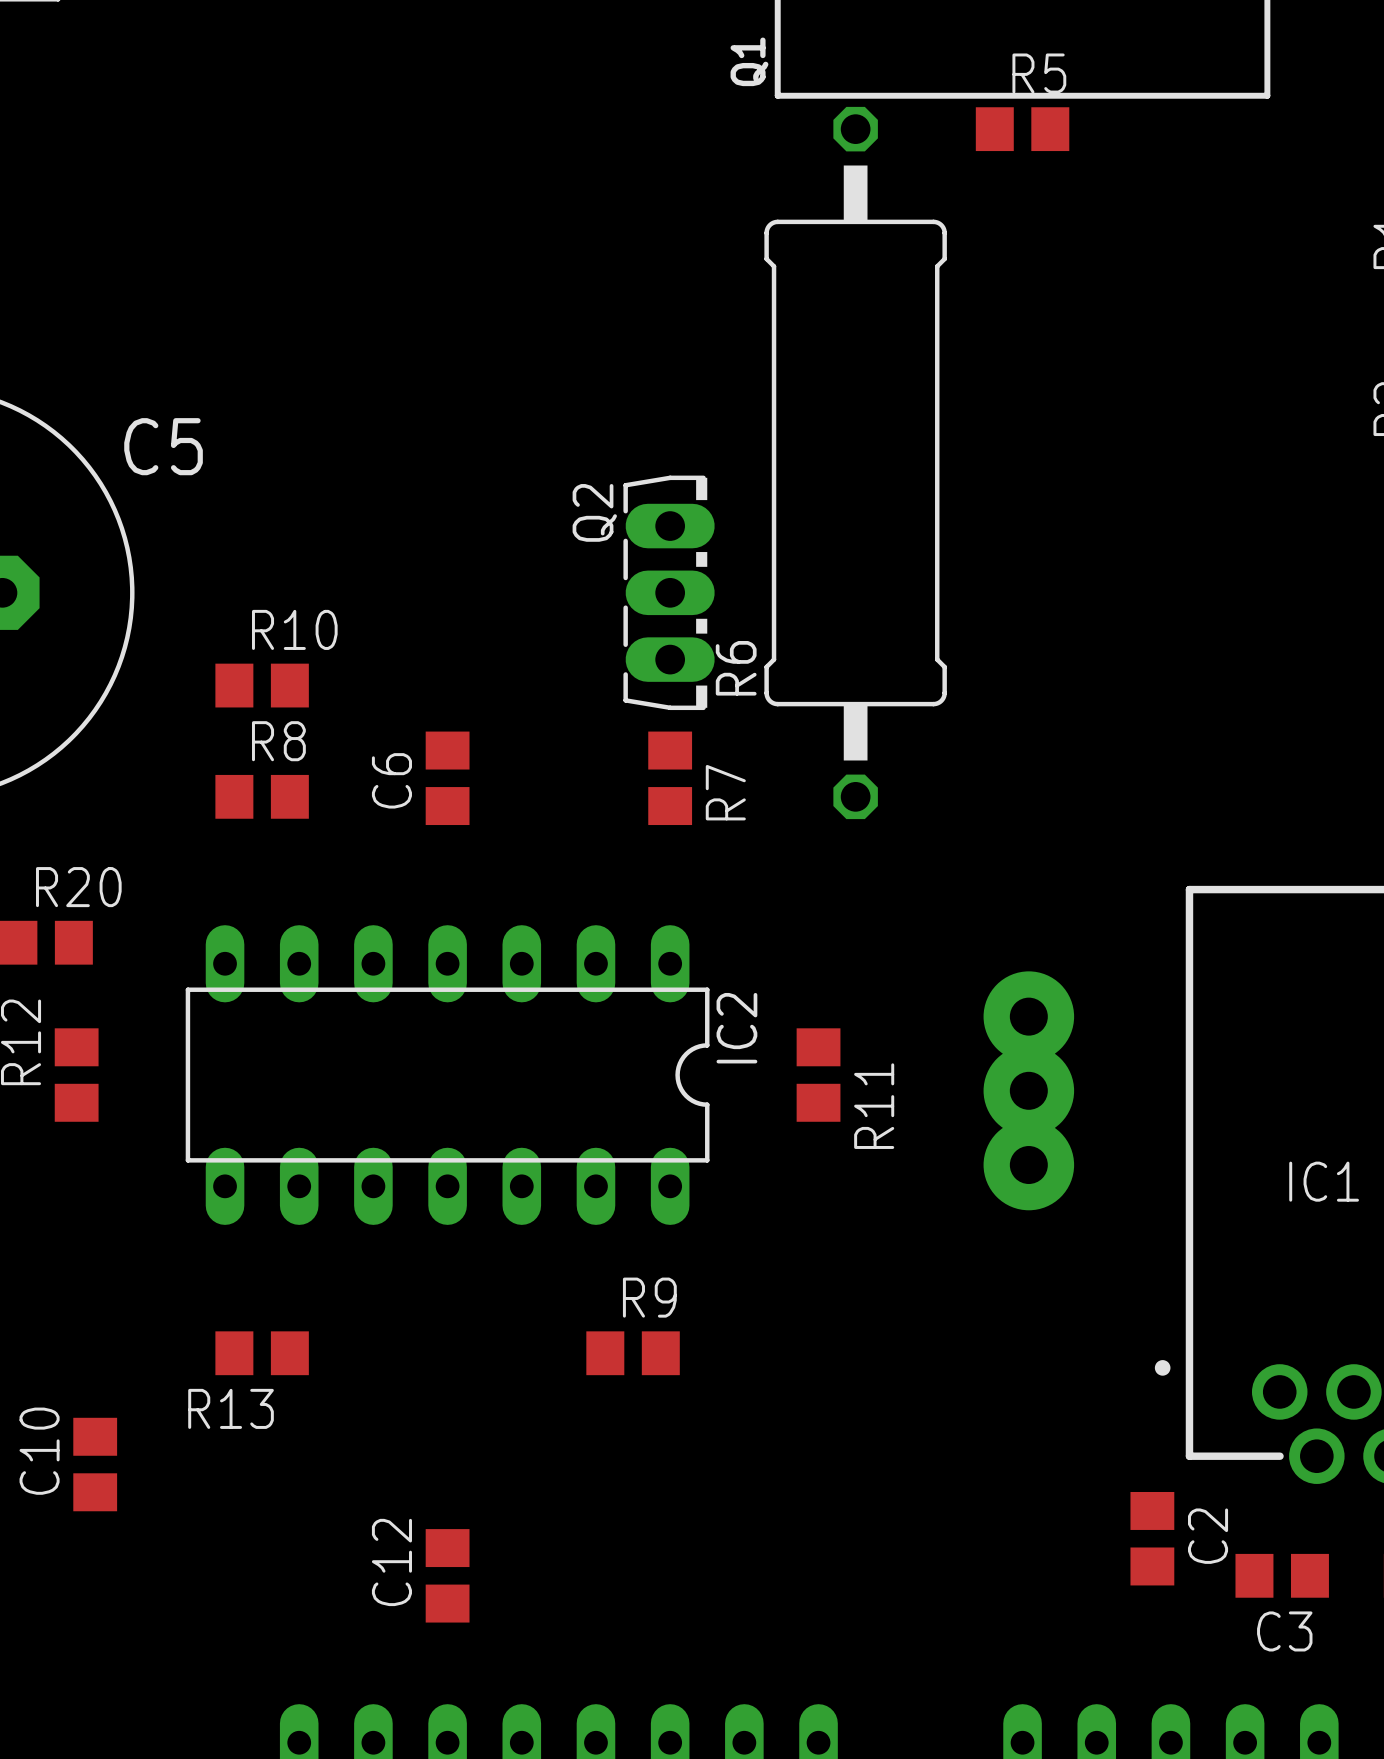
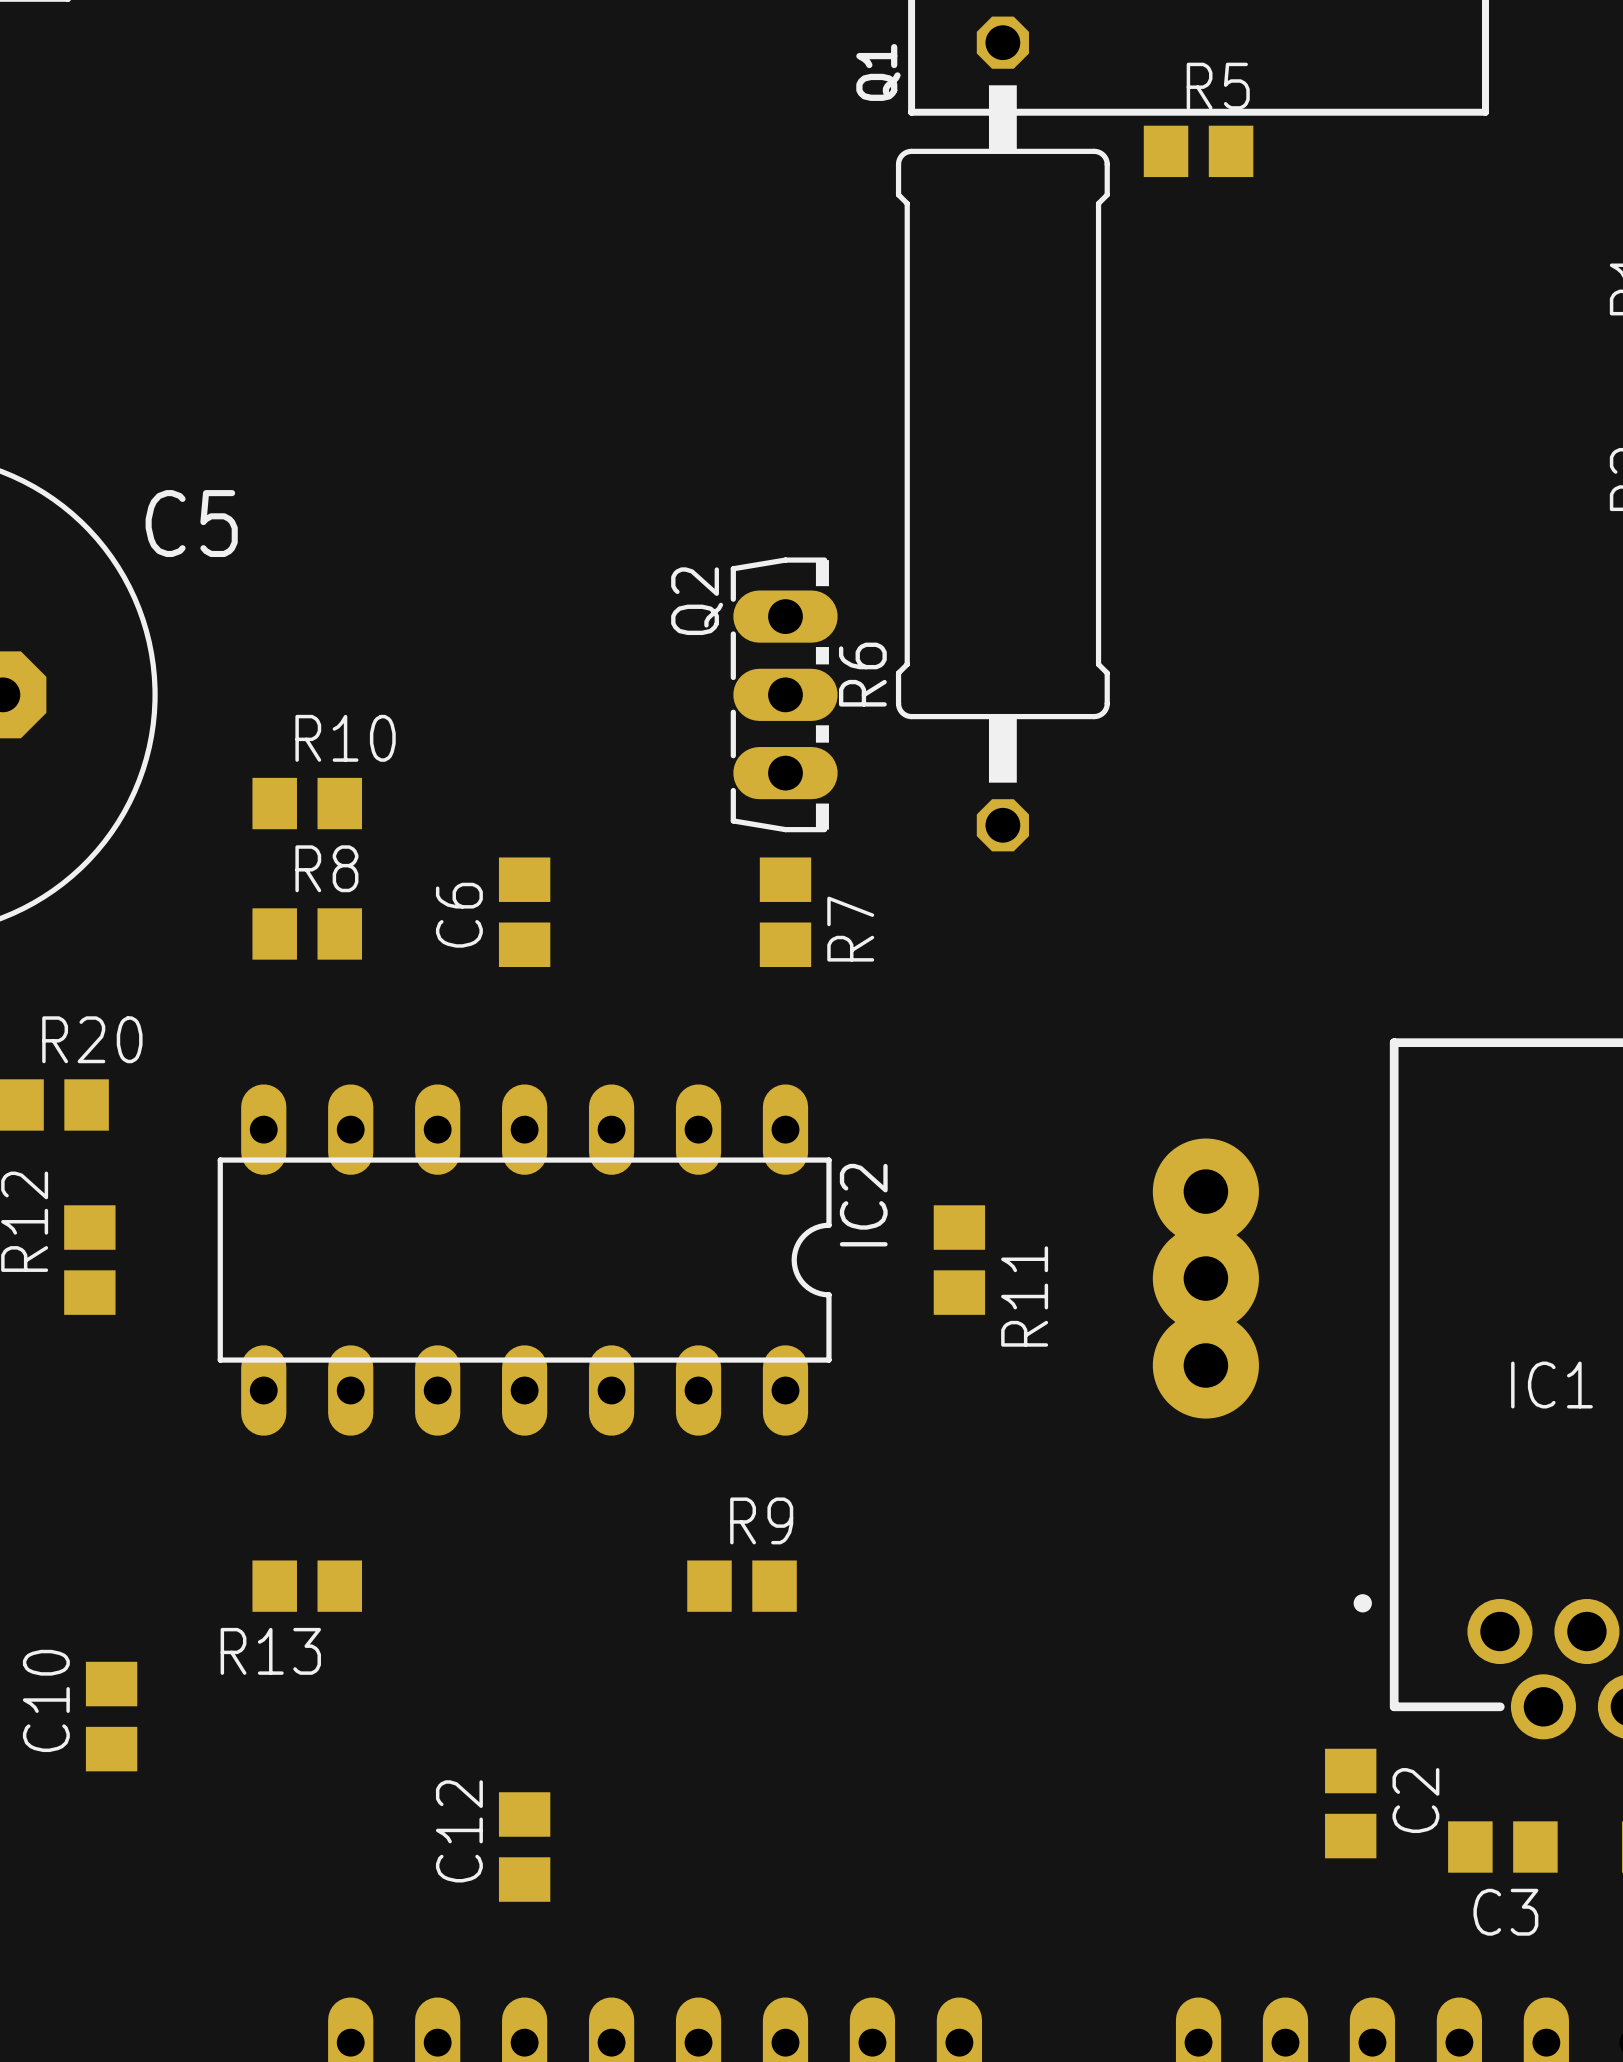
R6 position: (855, 462) -> (1002, 433)

